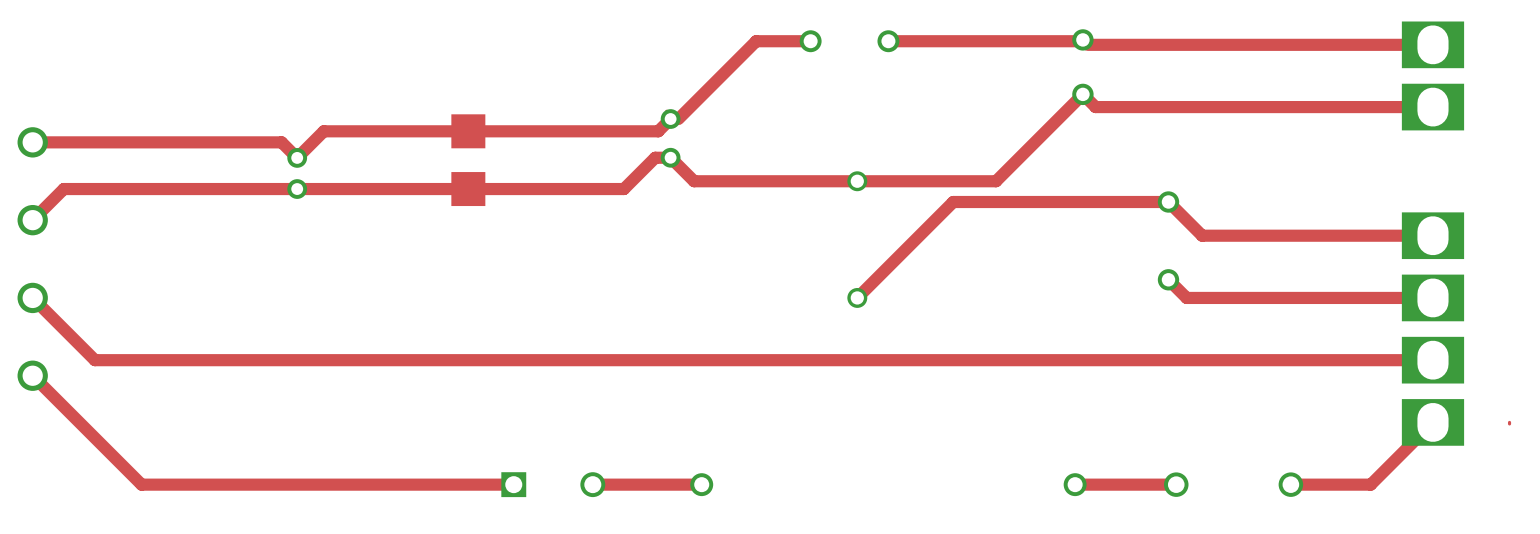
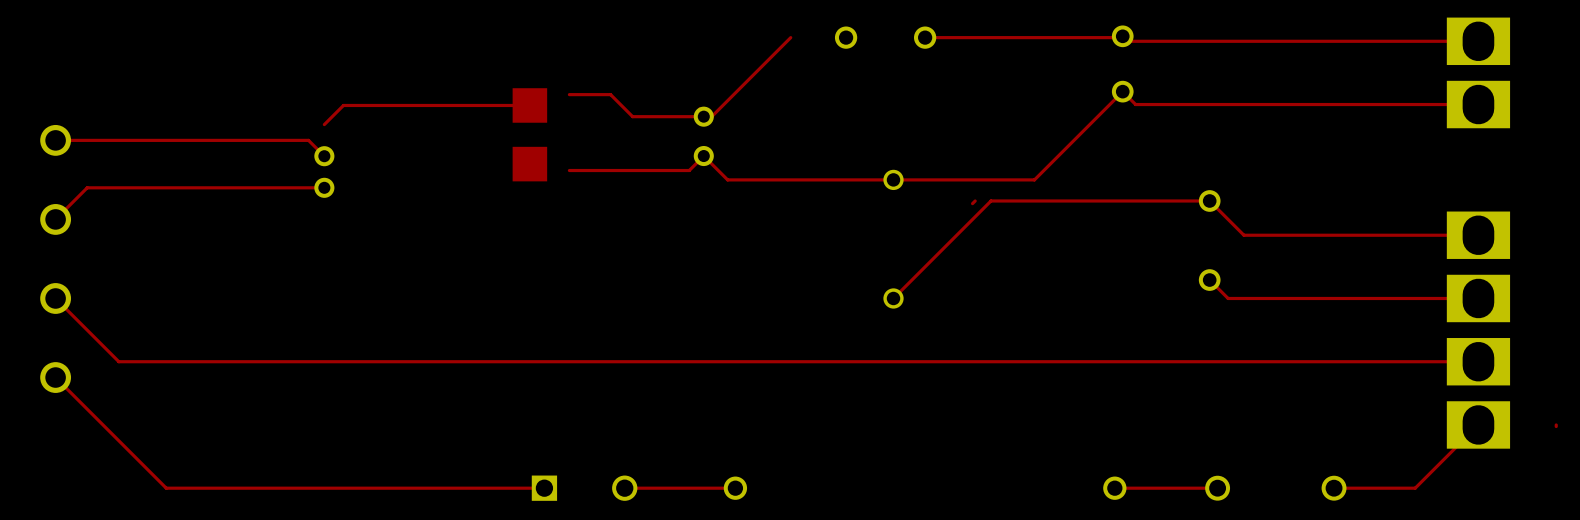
top track width: thick (756, 41) (678, 119) -> thin (790, 37) (711, 116)
top track: (810, 41) (756, 41) -> none
top track width: thick (1081, 41) (889, 41) -> thin (1121, 37) (926, 37)
top track width: thick (1432, 44) (1087, 44) -> thin (1478, 41) (1127, 41)
top track width: thick (1432, 107) (1095, 107) (1082, 94) (996, 181) (694, 181) (670, 157) -> thin (1478, 104) (1135, 104) (1122, 91) (1034, 179) (727, 179) (703, 156)
top track: none -> (529, 105) (343, 105) (324, 124)
top track: (670, 119) (658, 131) (323, 131) (297, 157) -> (703, 116) (632, 116) (610, 94) (569, 94)
top track width: thick (32, 142) (281, 142) (297, 157) -> thin (55, 140) (308, 140) (324, 156)
top track: (670, 157) (655, 157) (623, 189) (297, 189) -> (703, 156) (689, 170) (569, 170)
part position: (468, 160) -> (529, 134)
top track width: thick (297, 189) (63, 189) (32, 220) -> thin (324, 187) (87, 187) (55, 219)
top track: none -> (975, 200) (972, 203)
top track width: thick (1432, 235) (1202, 235) (1168, 202) (953, 202) (857, 297) -> thin (1478, 235) (1243, 235) (1209, 200) (991, 200) (893, 298)
top track width: thick (1168, 279) (1186, 297) (1432, 297) -> thin (1209, 280) (1228, 298) (1478, 298)
top track width: thick (32, 297) (94, 360) (1432, 360) -> thin (55, 298) (118, 361) (1478, 361)
top track width: thick (32, 375) (141, 484) (513, 484) -> thin (55, 377) (166, 488) (544, 488)
top track width: thick (1432, 422) (1370, 484) (1290, 484) -> thin (1478, 424) (1415, 488) (1334, 488)
top track width: thick (701, 484) (592, 484) -> thin (735, 488) (624, 488)
top track width: thick (1176, 484) (1075, 484) -> thin (1217, 488) (1114, 488)

